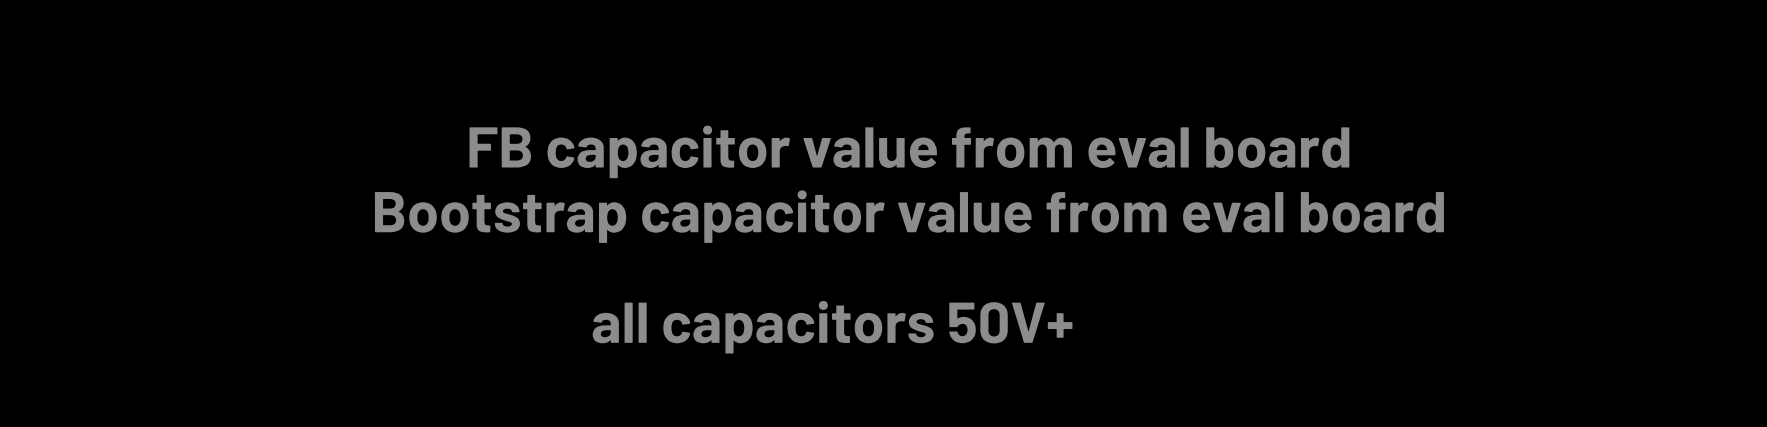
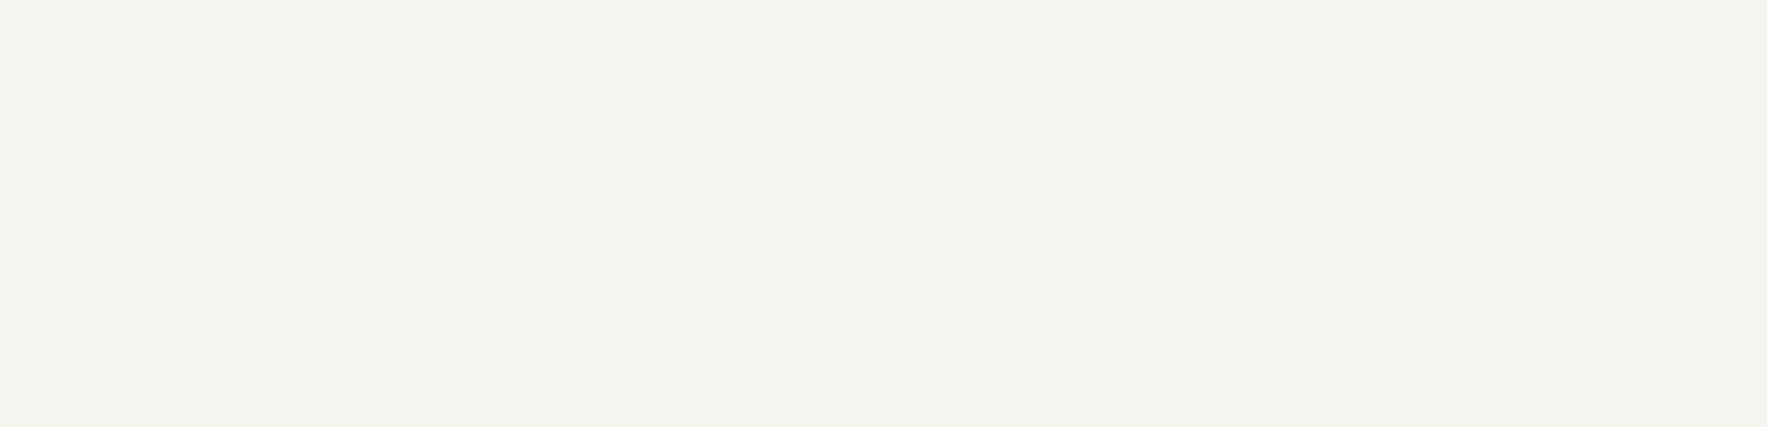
text: FB capacitor value from eval board (909, 151) -> none
text: Bootstrap capacitor value from eval board (909, 216) -> none
text: all capacitors 50V+ (832, 327) -> none

